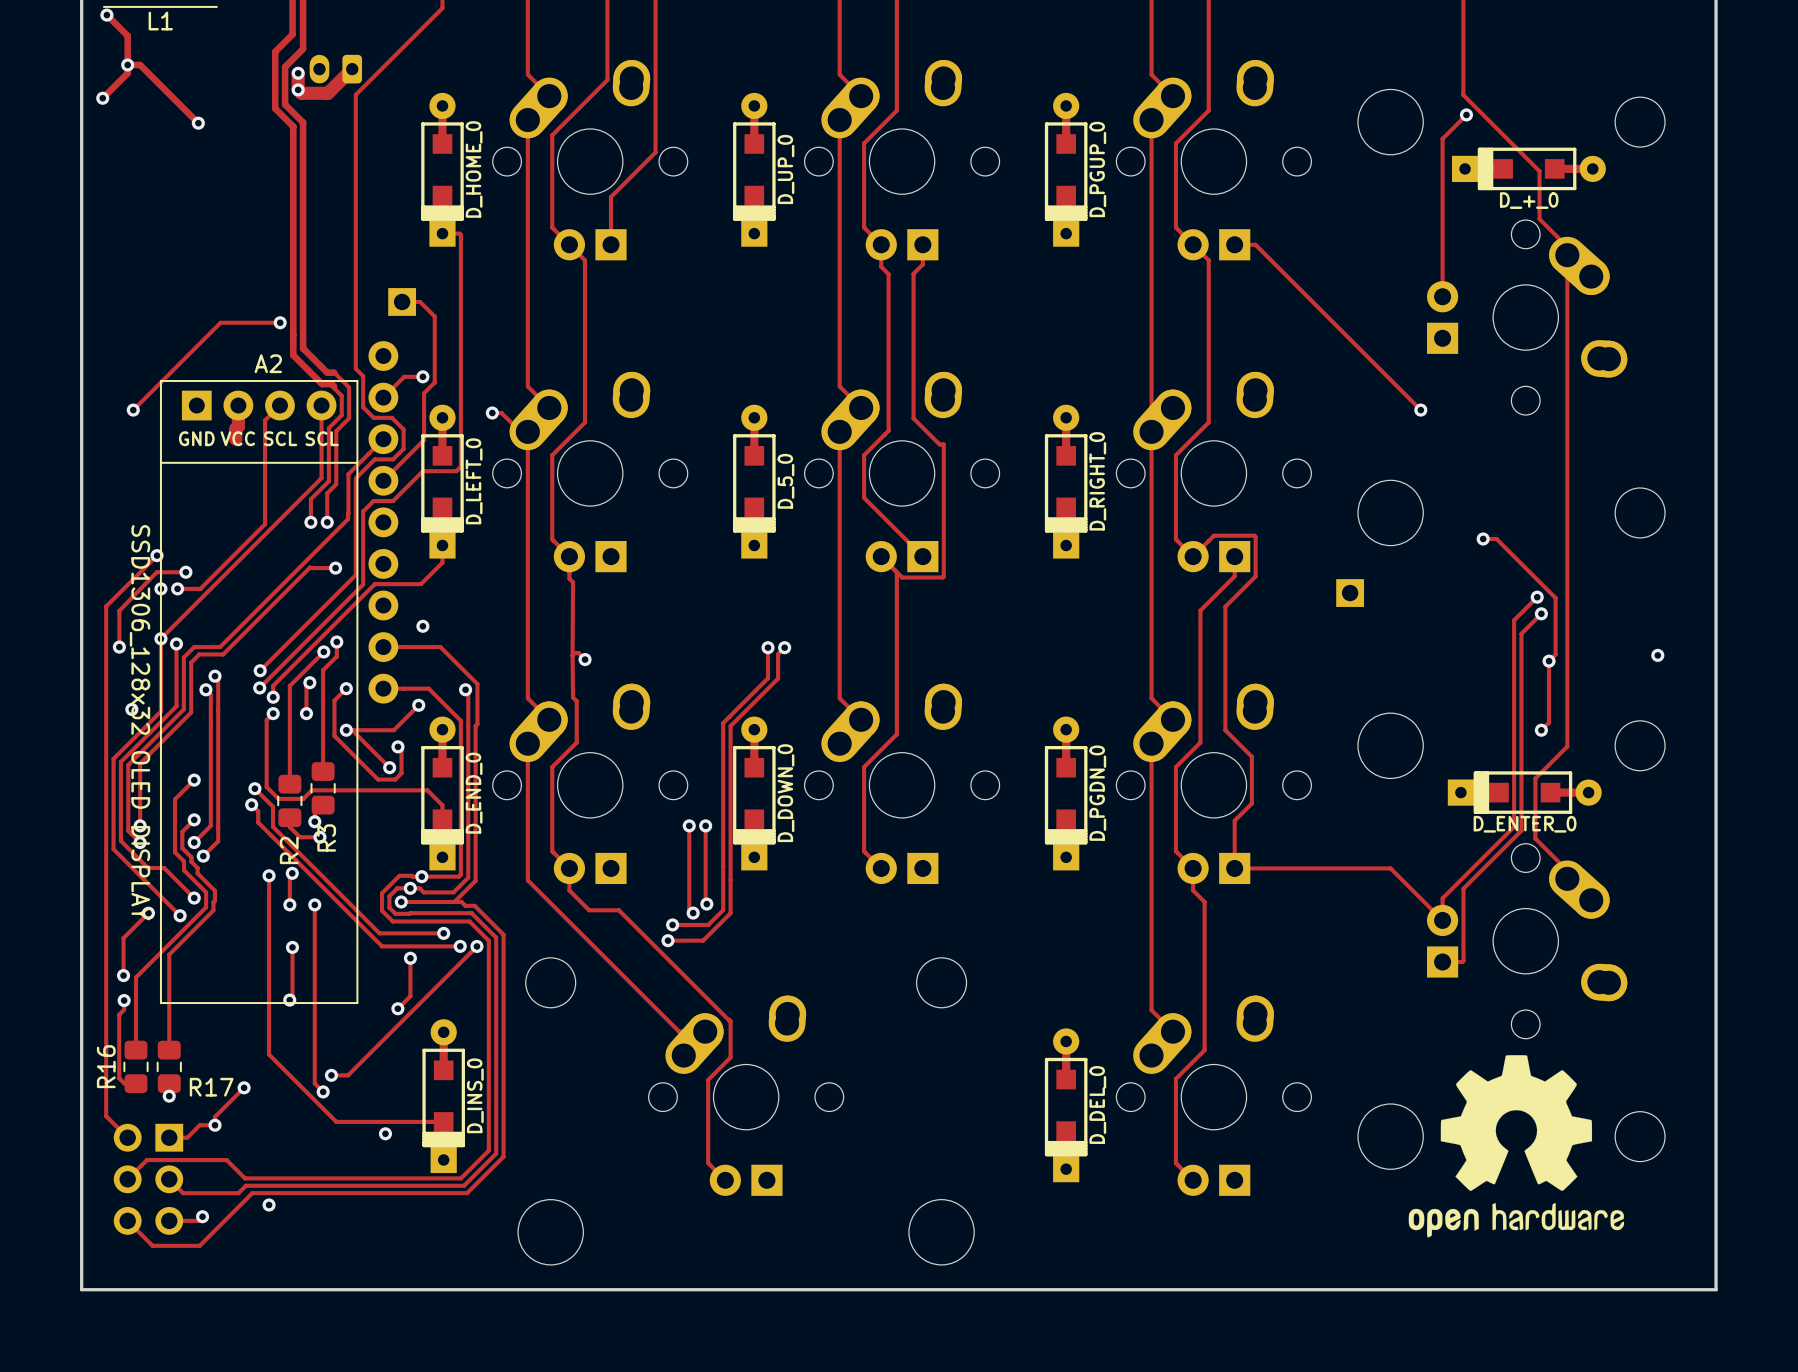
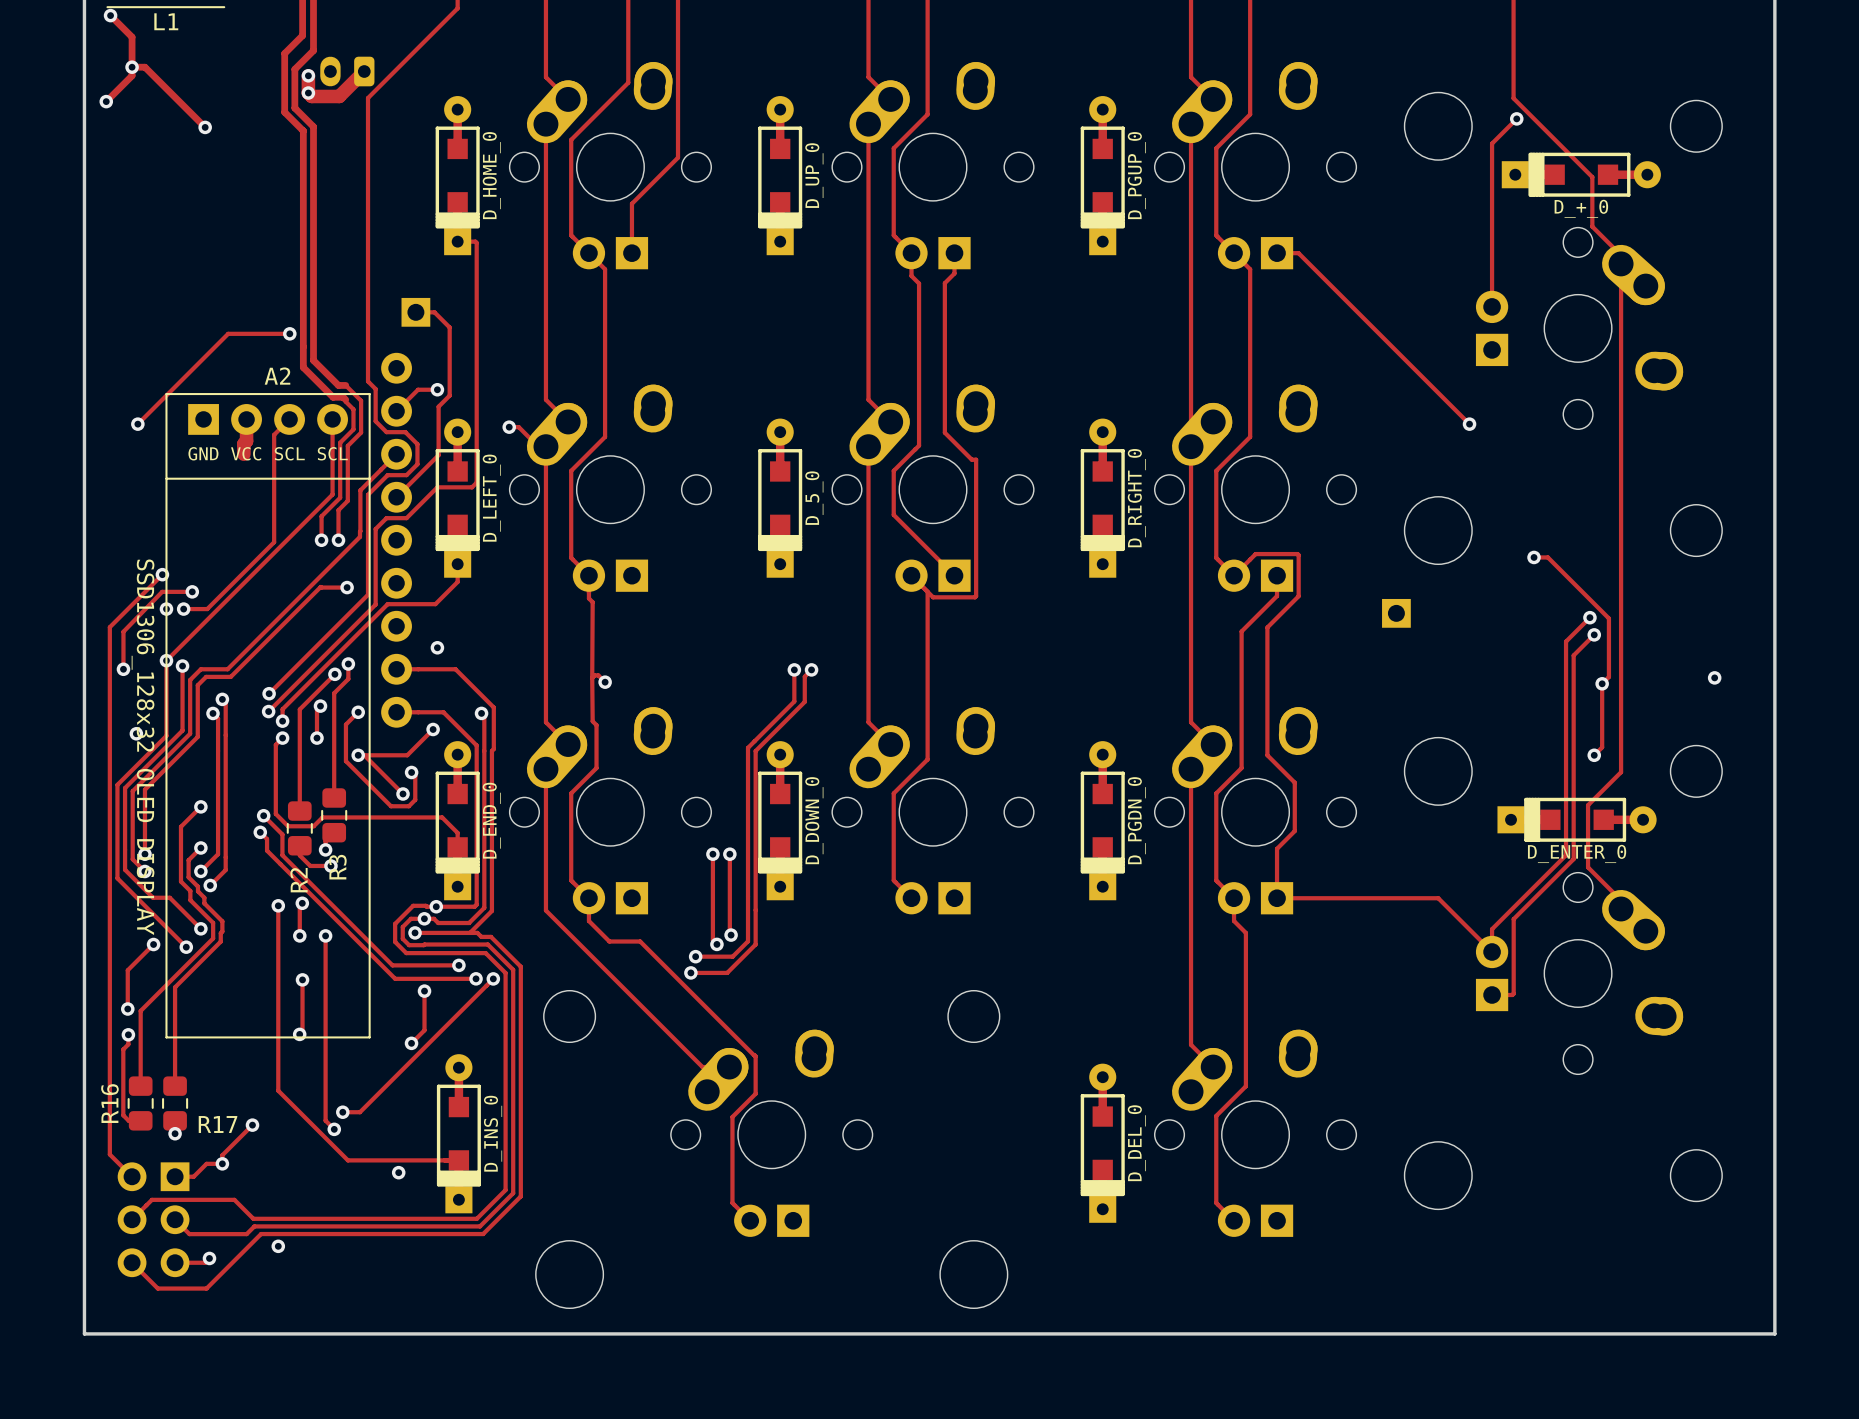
drawing: [1408, 1055, 1625, 1238] -> none

